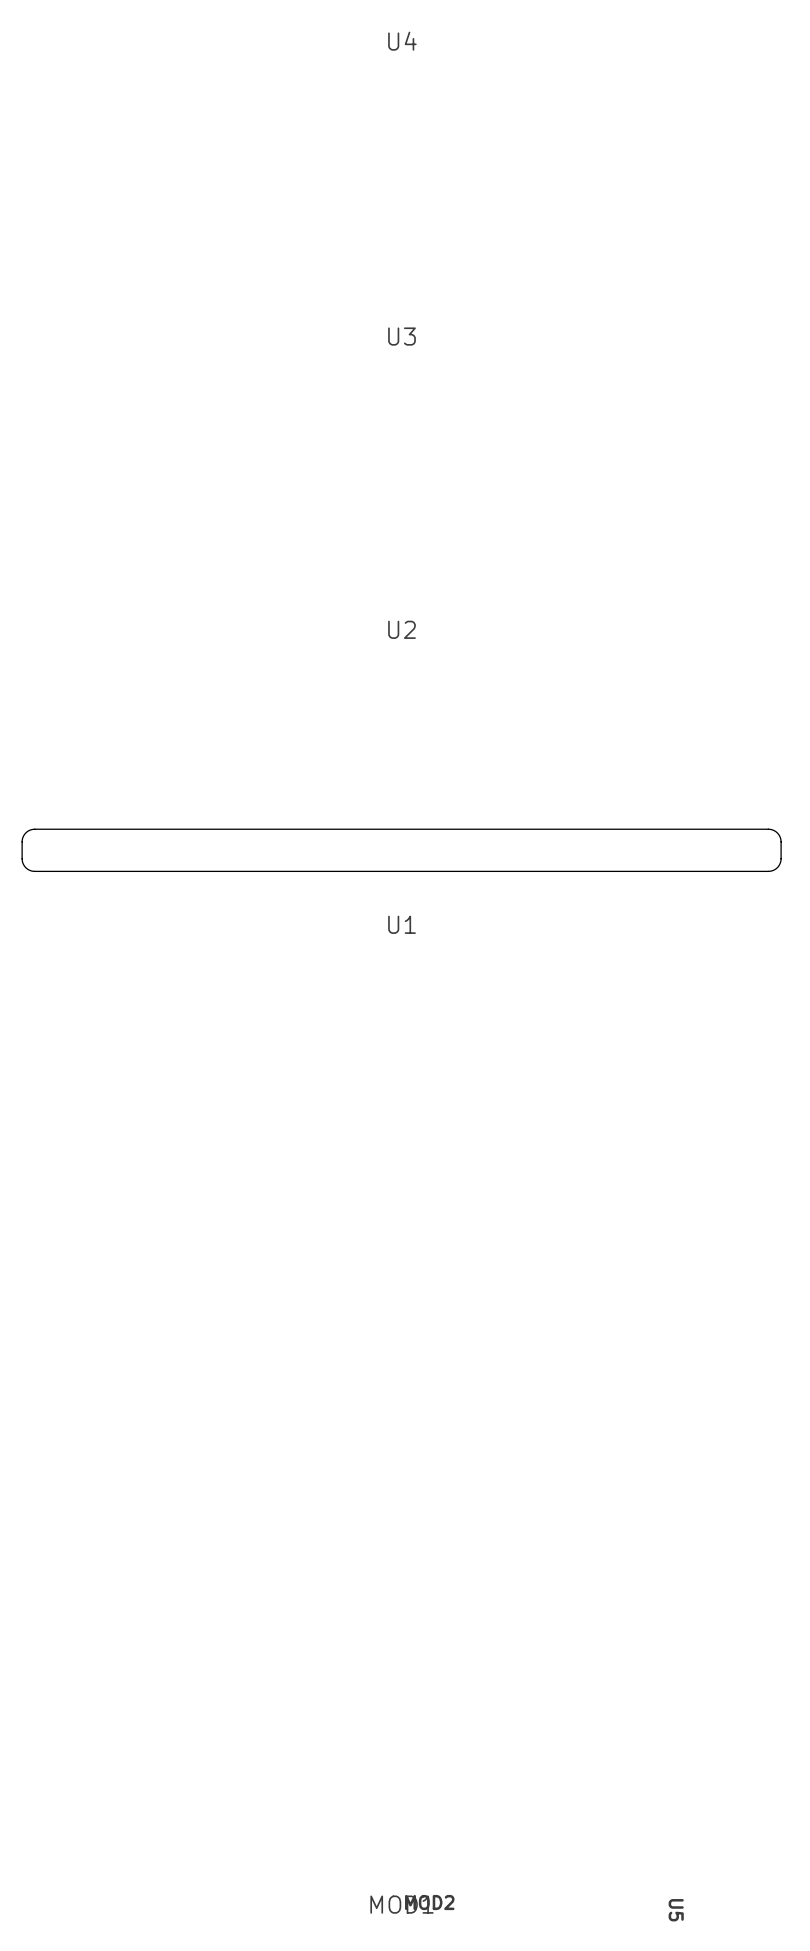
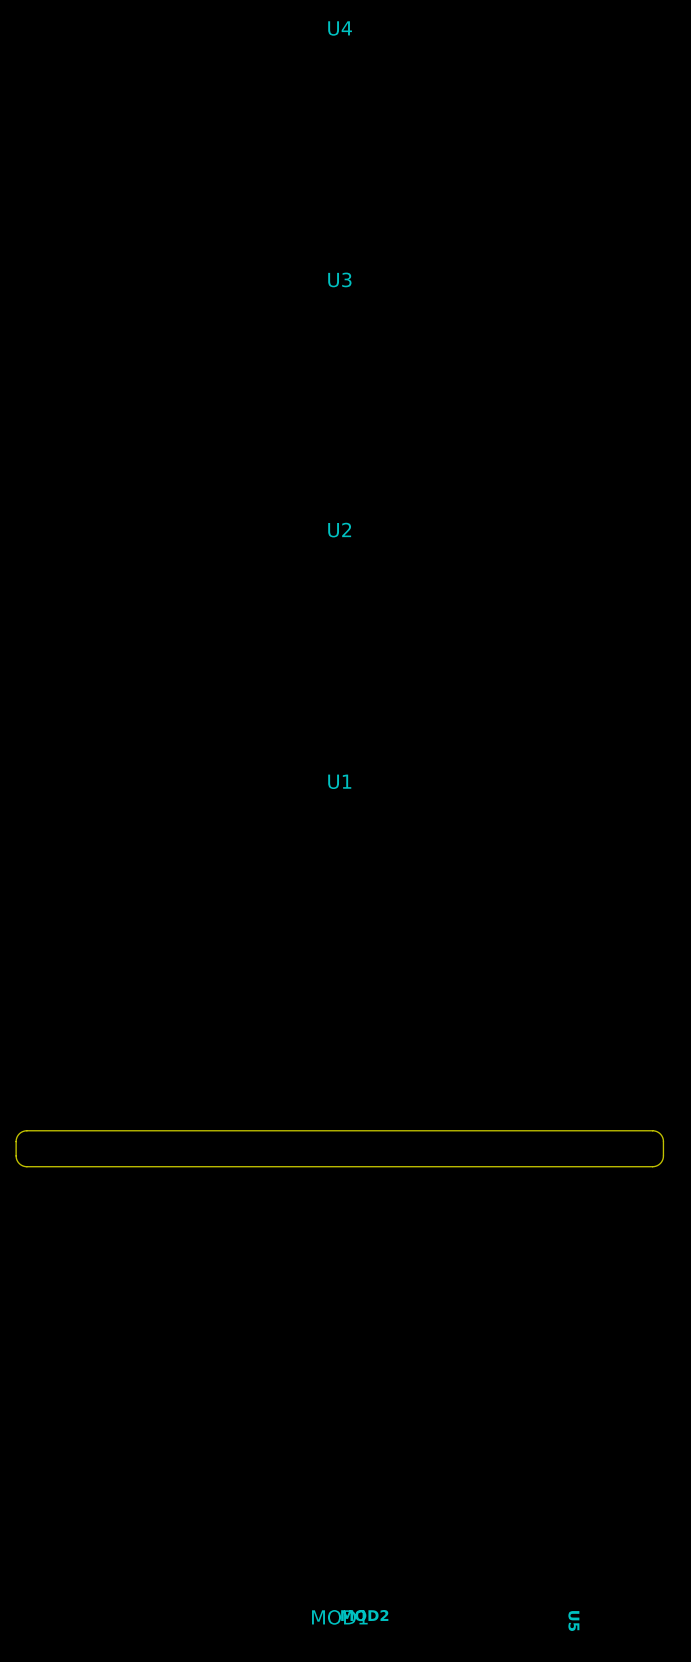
board edge: (34, 829) (768, 829) (776, 831) (780, 837) (781, 858) (777, 867) (768, 871) (34, 871) (25, 867) (22, 858) (23, 837) (28, 830) (34, 829) -> none
board edge: none -> (26, 1130) (652, 1130) (658, 1132) (662, 1137) (663, 1155) (660, 1163) (652, 1166) (26, 1166) (19, 1163) (16, 1155) (16, 1137) (20, 1132) (26, 1130)

